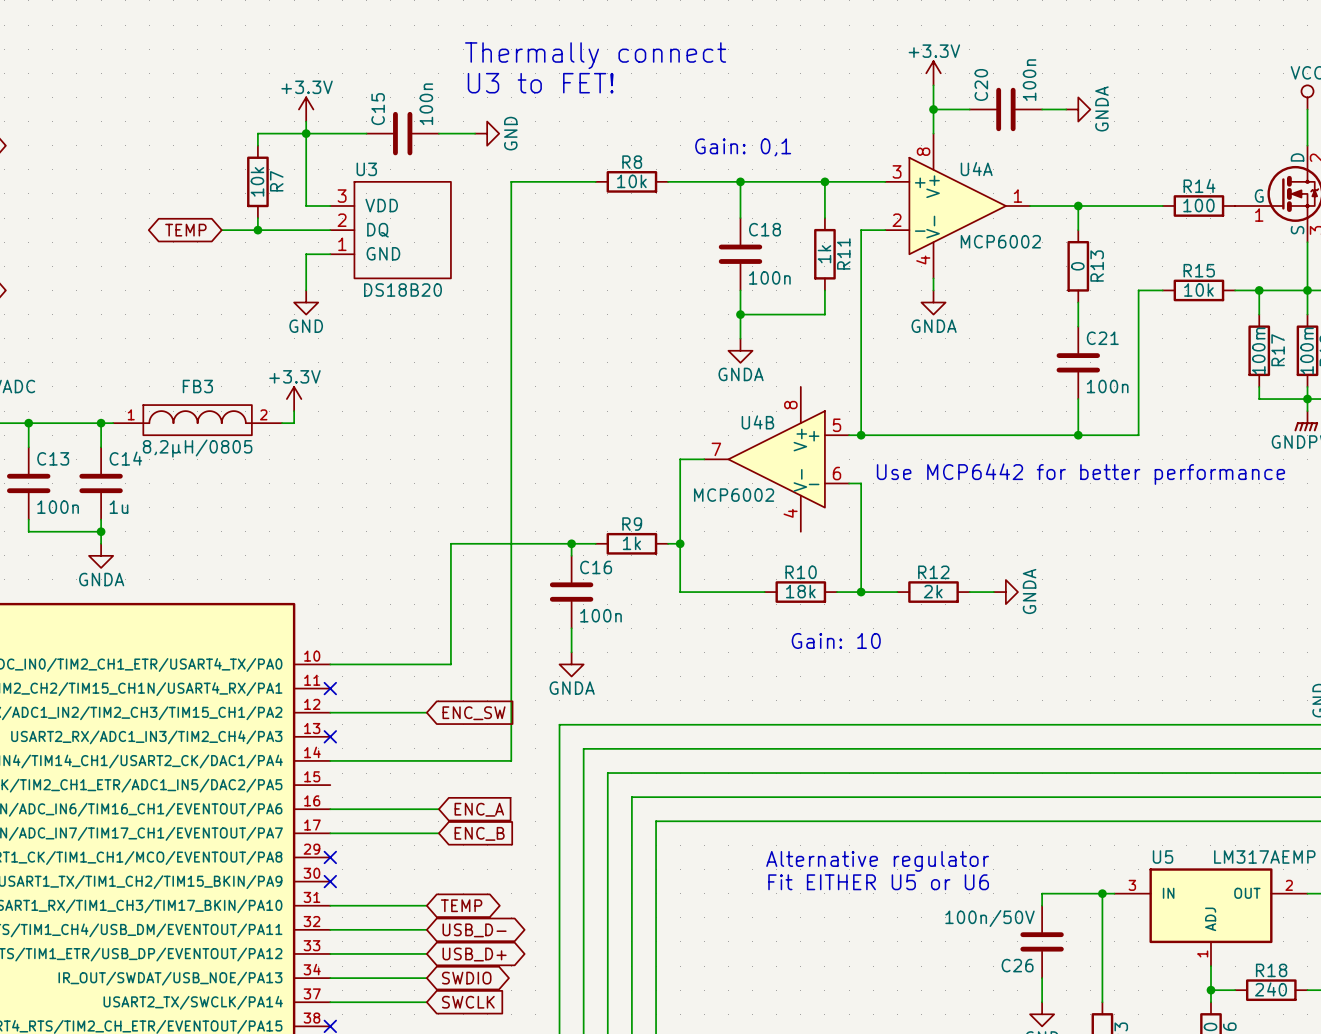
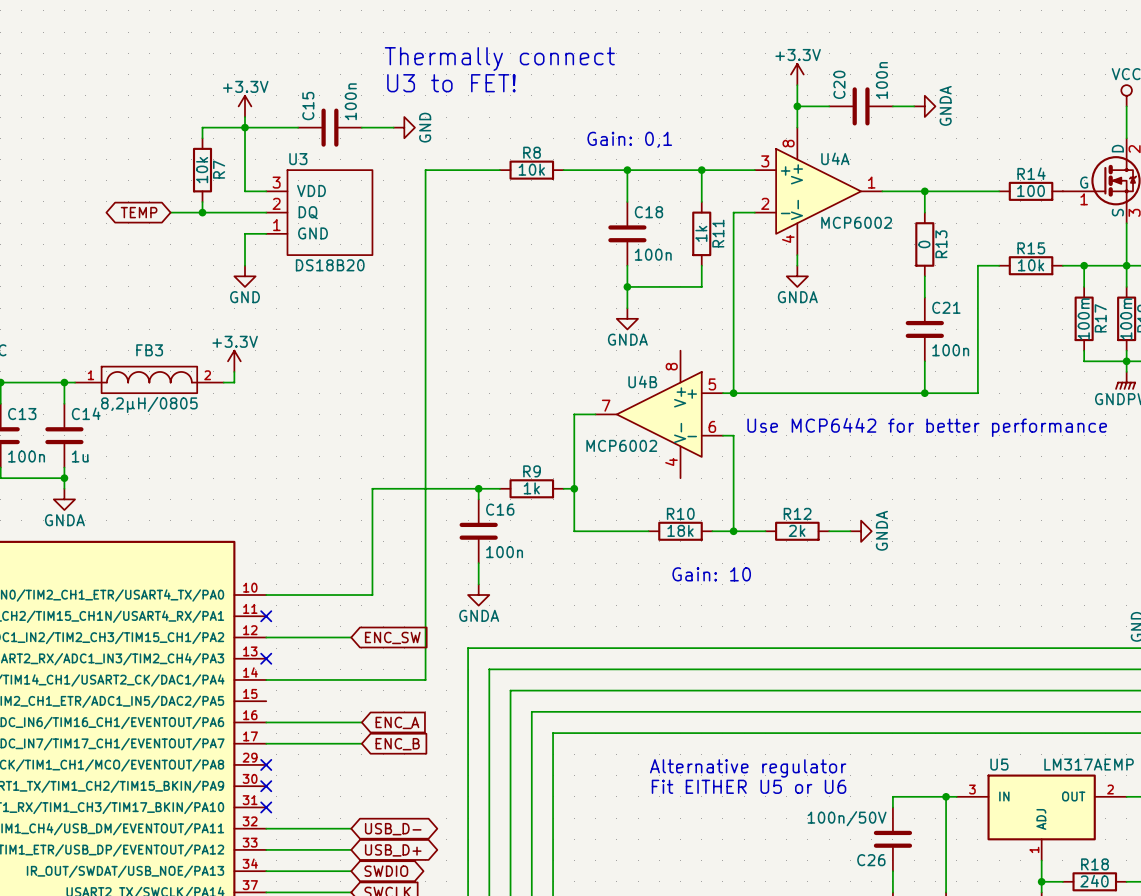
wire: (330, 905) (426, 905) -> none
no-connect mark: none -> (266, 807)
global label: TEMP (461, 905) -> none

